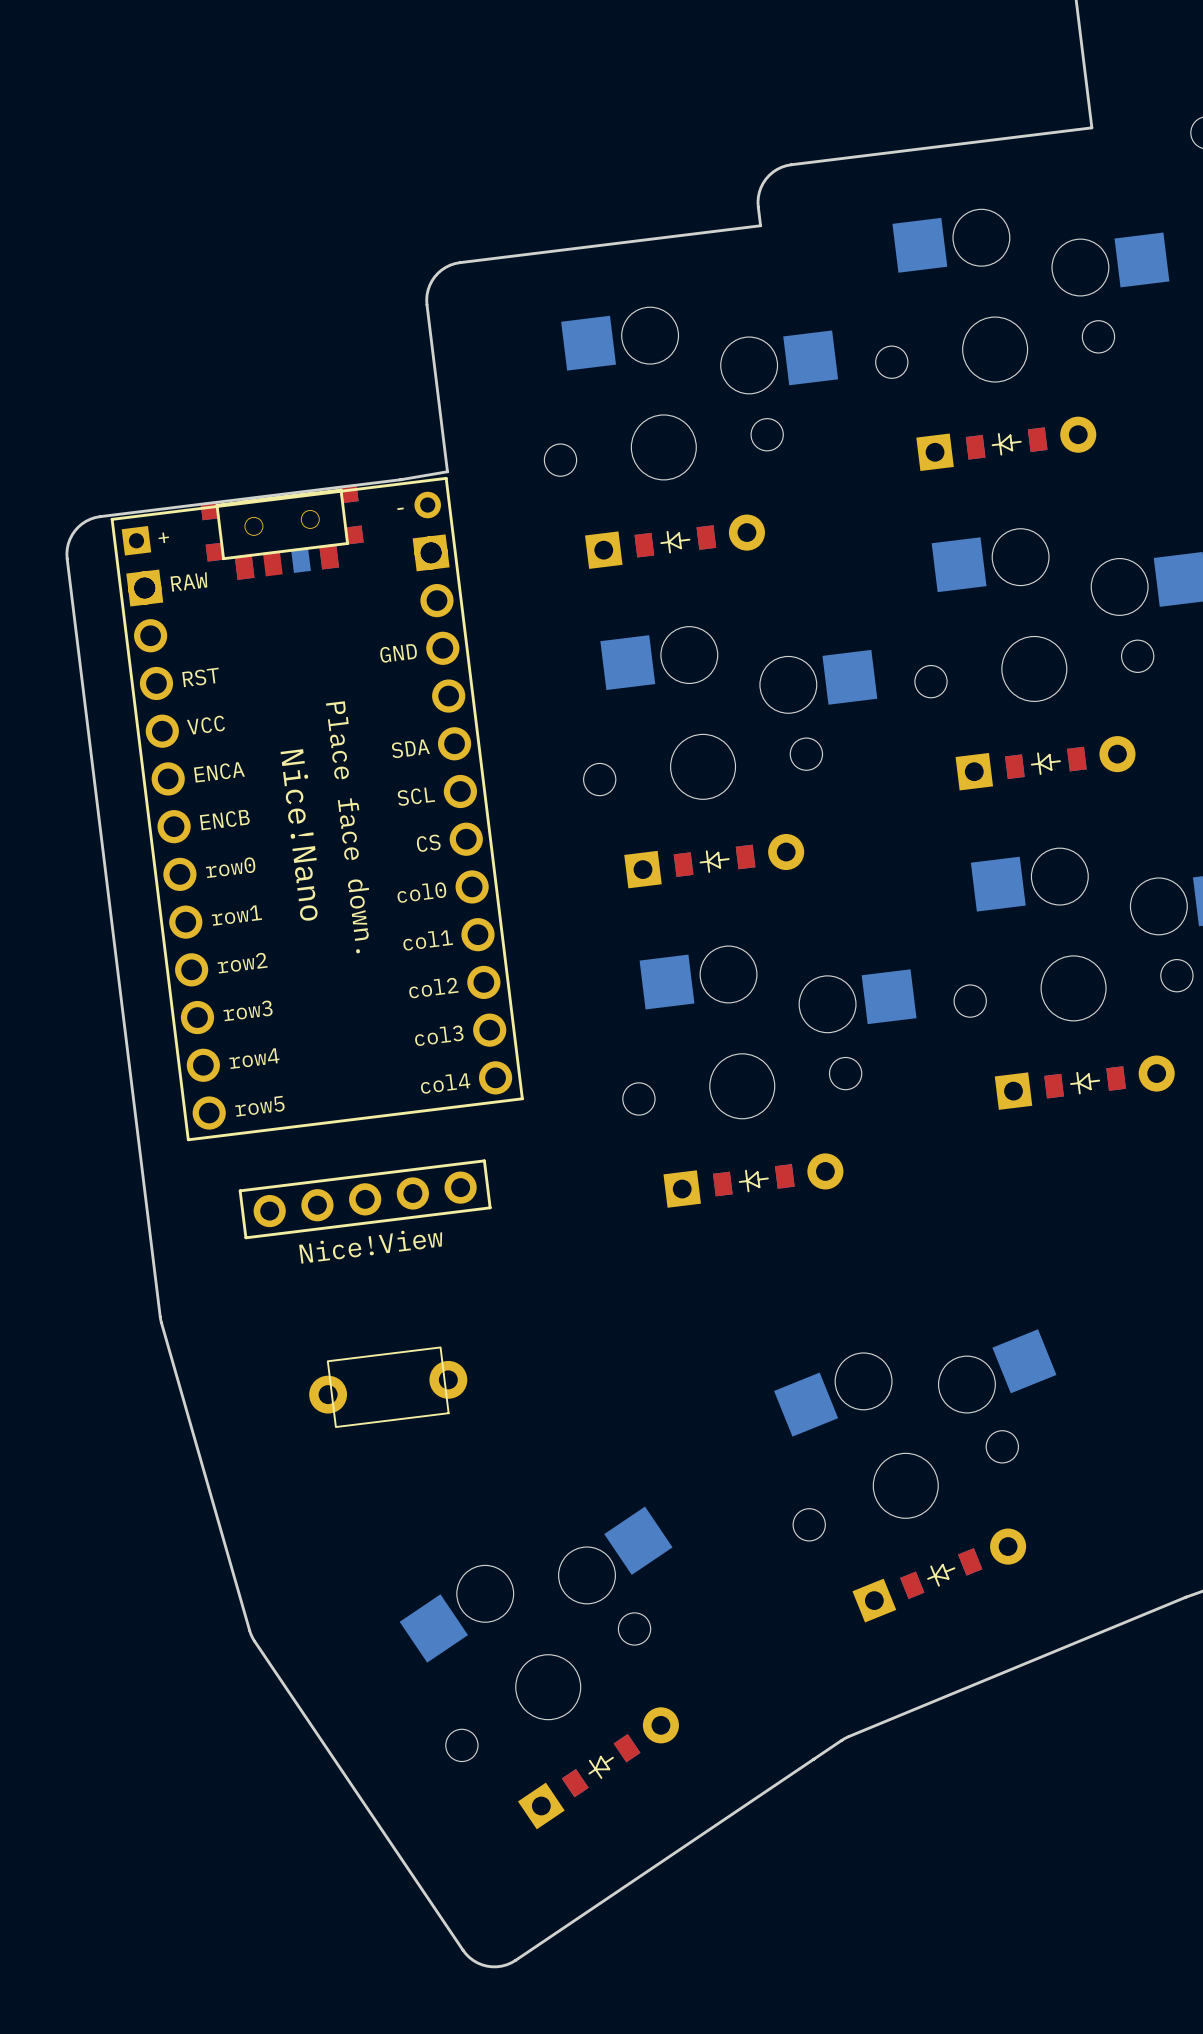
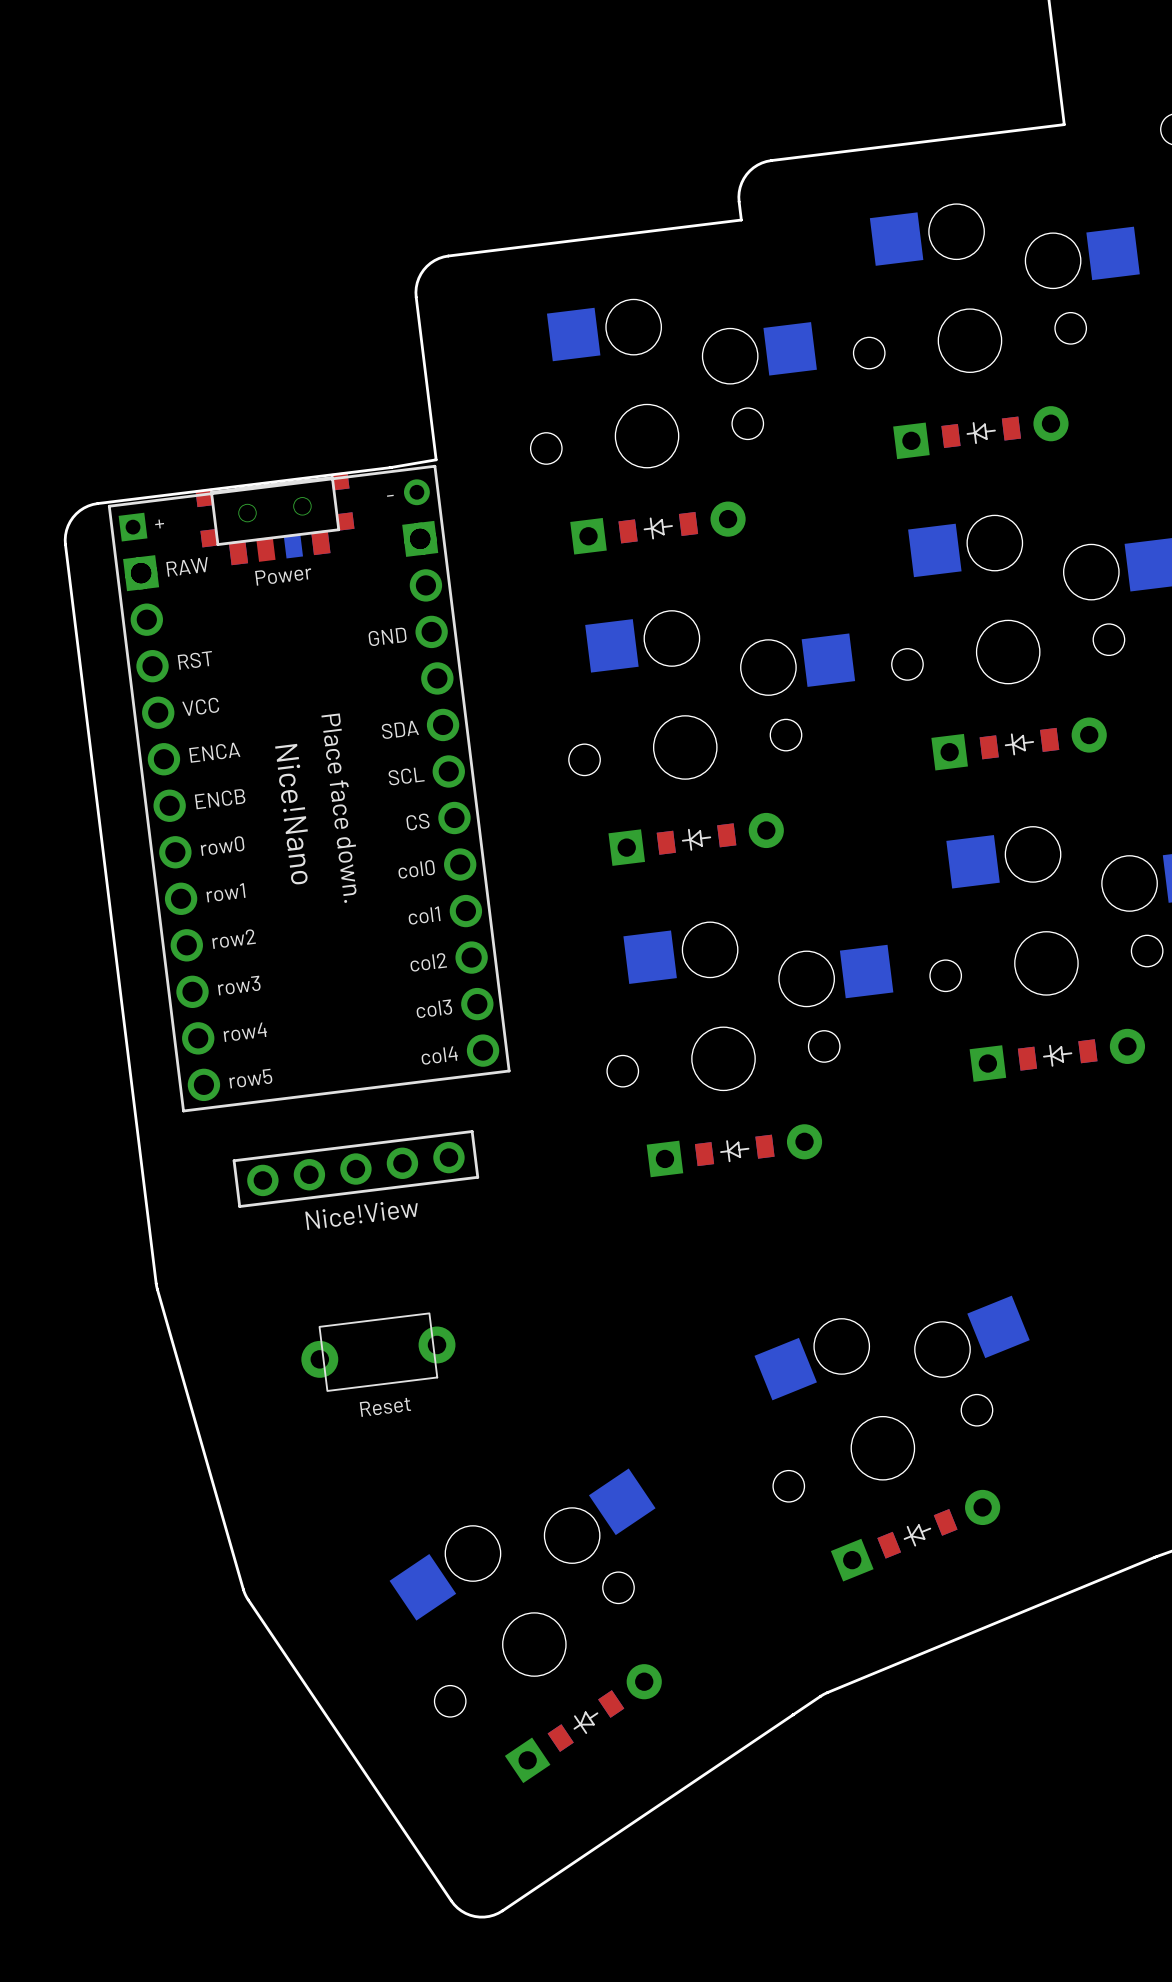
part text: none -> Power (283, 577)
part text: none -> Reset (385, 1407)

